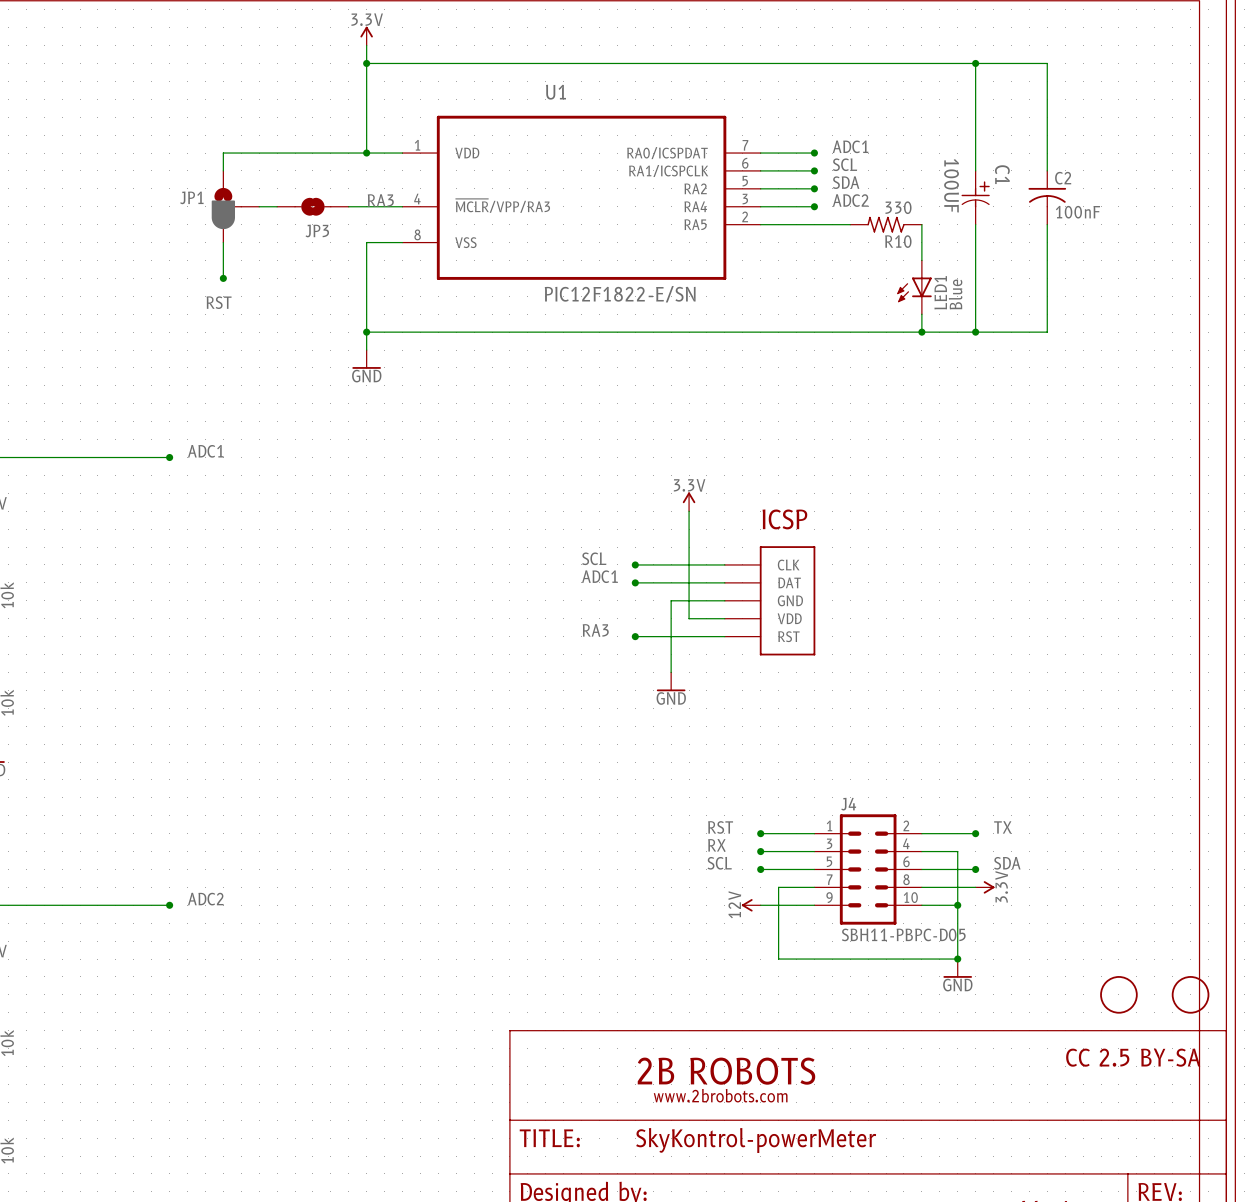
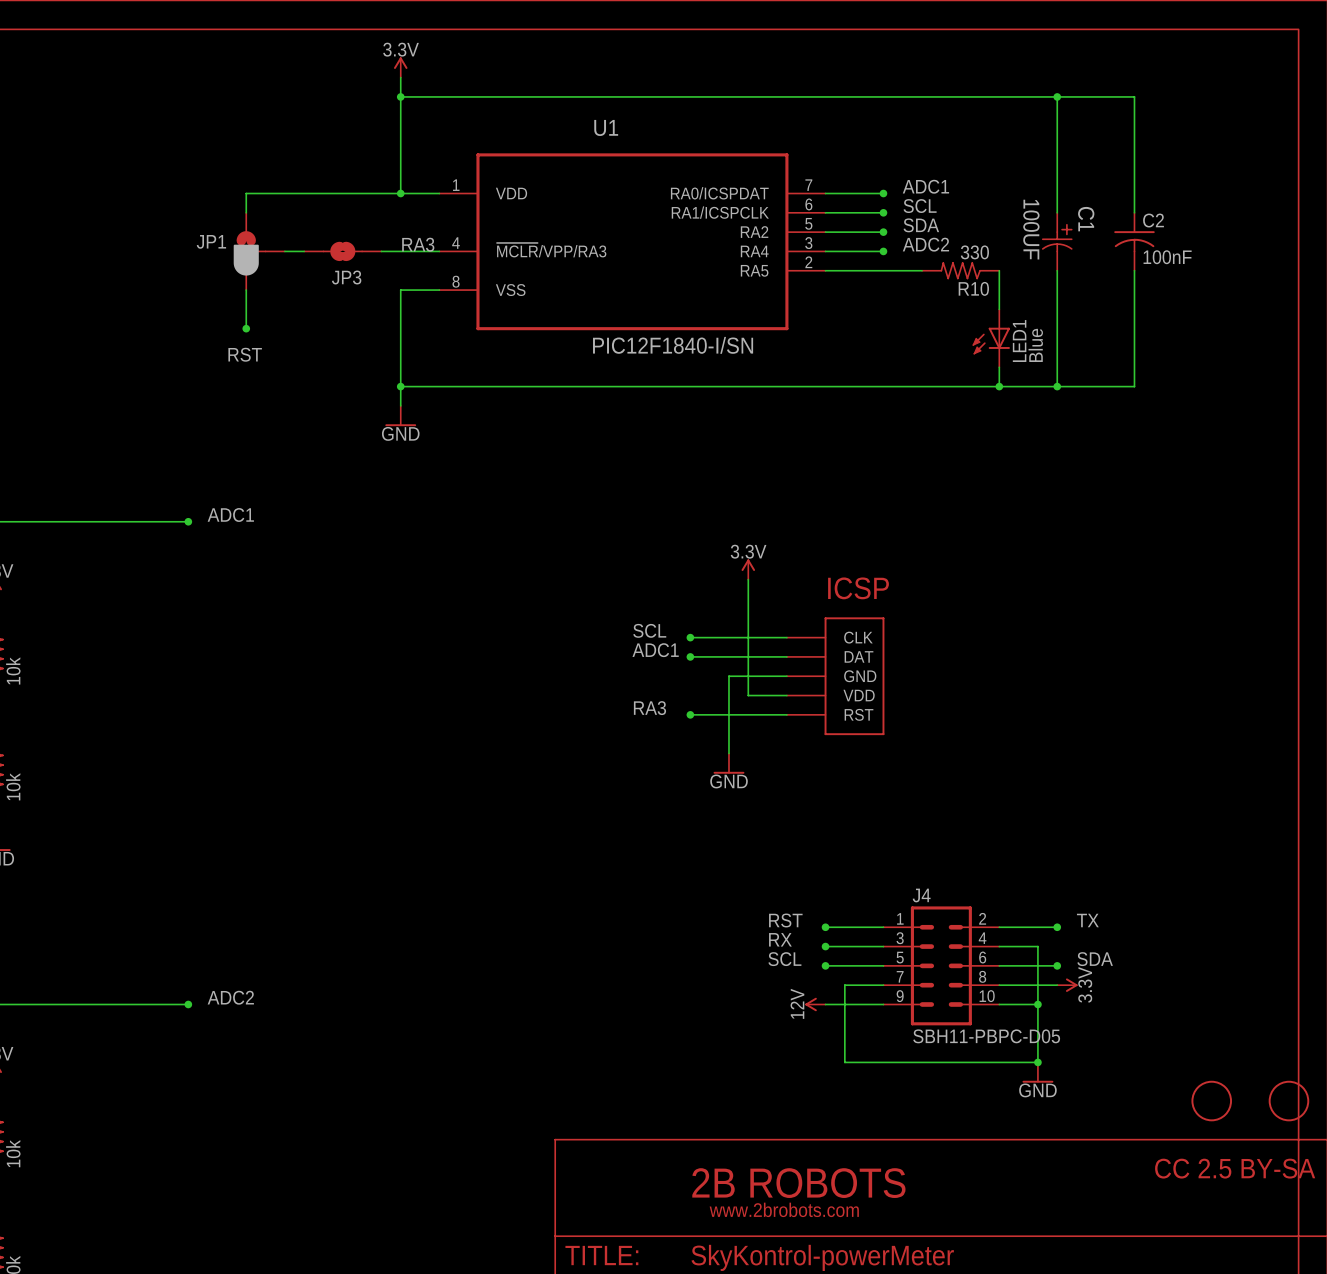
U1 value: PIC12F1822-E/SN (620, 294) -> PIC12F1840-I/SN (673, 345)

